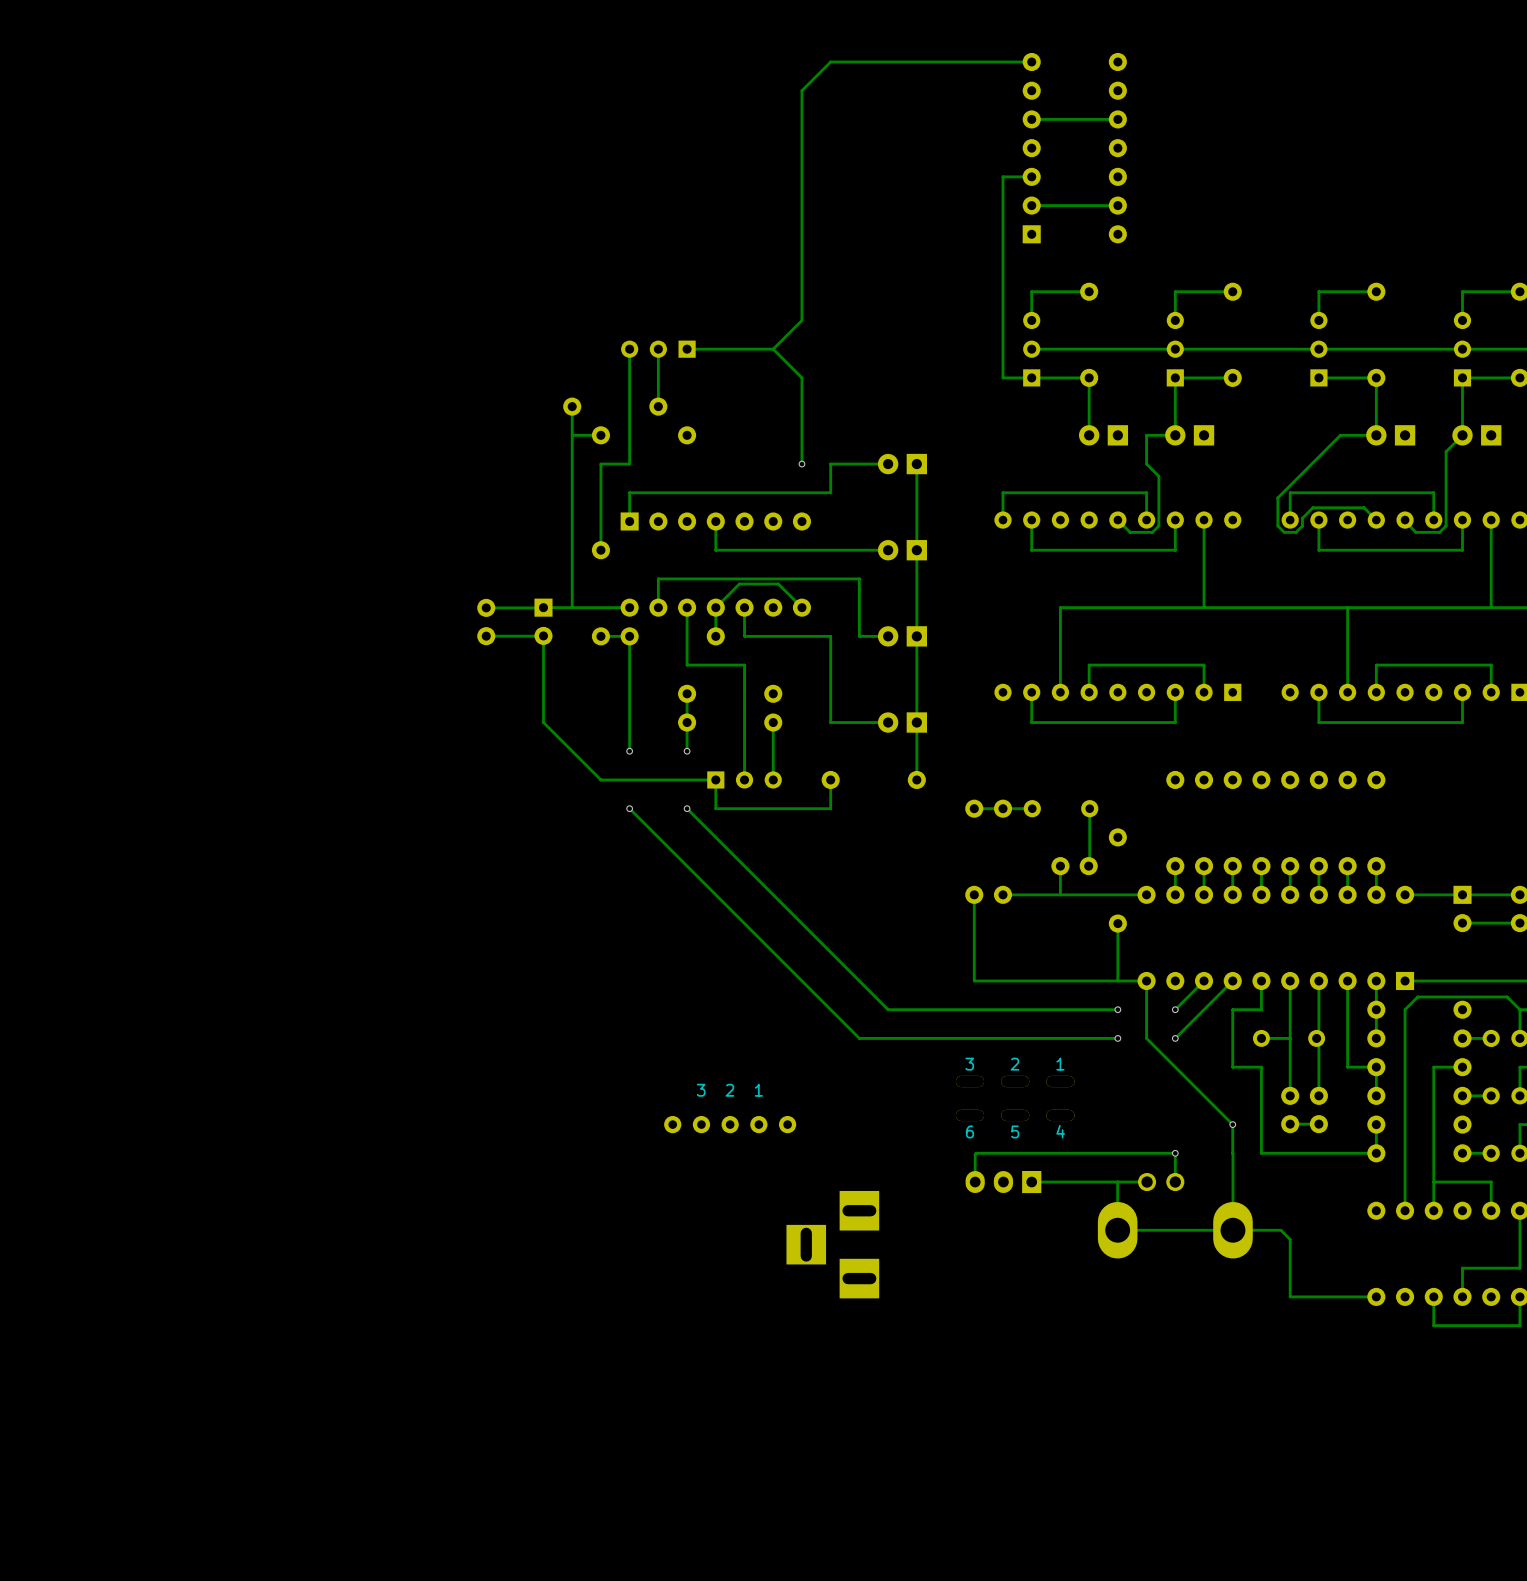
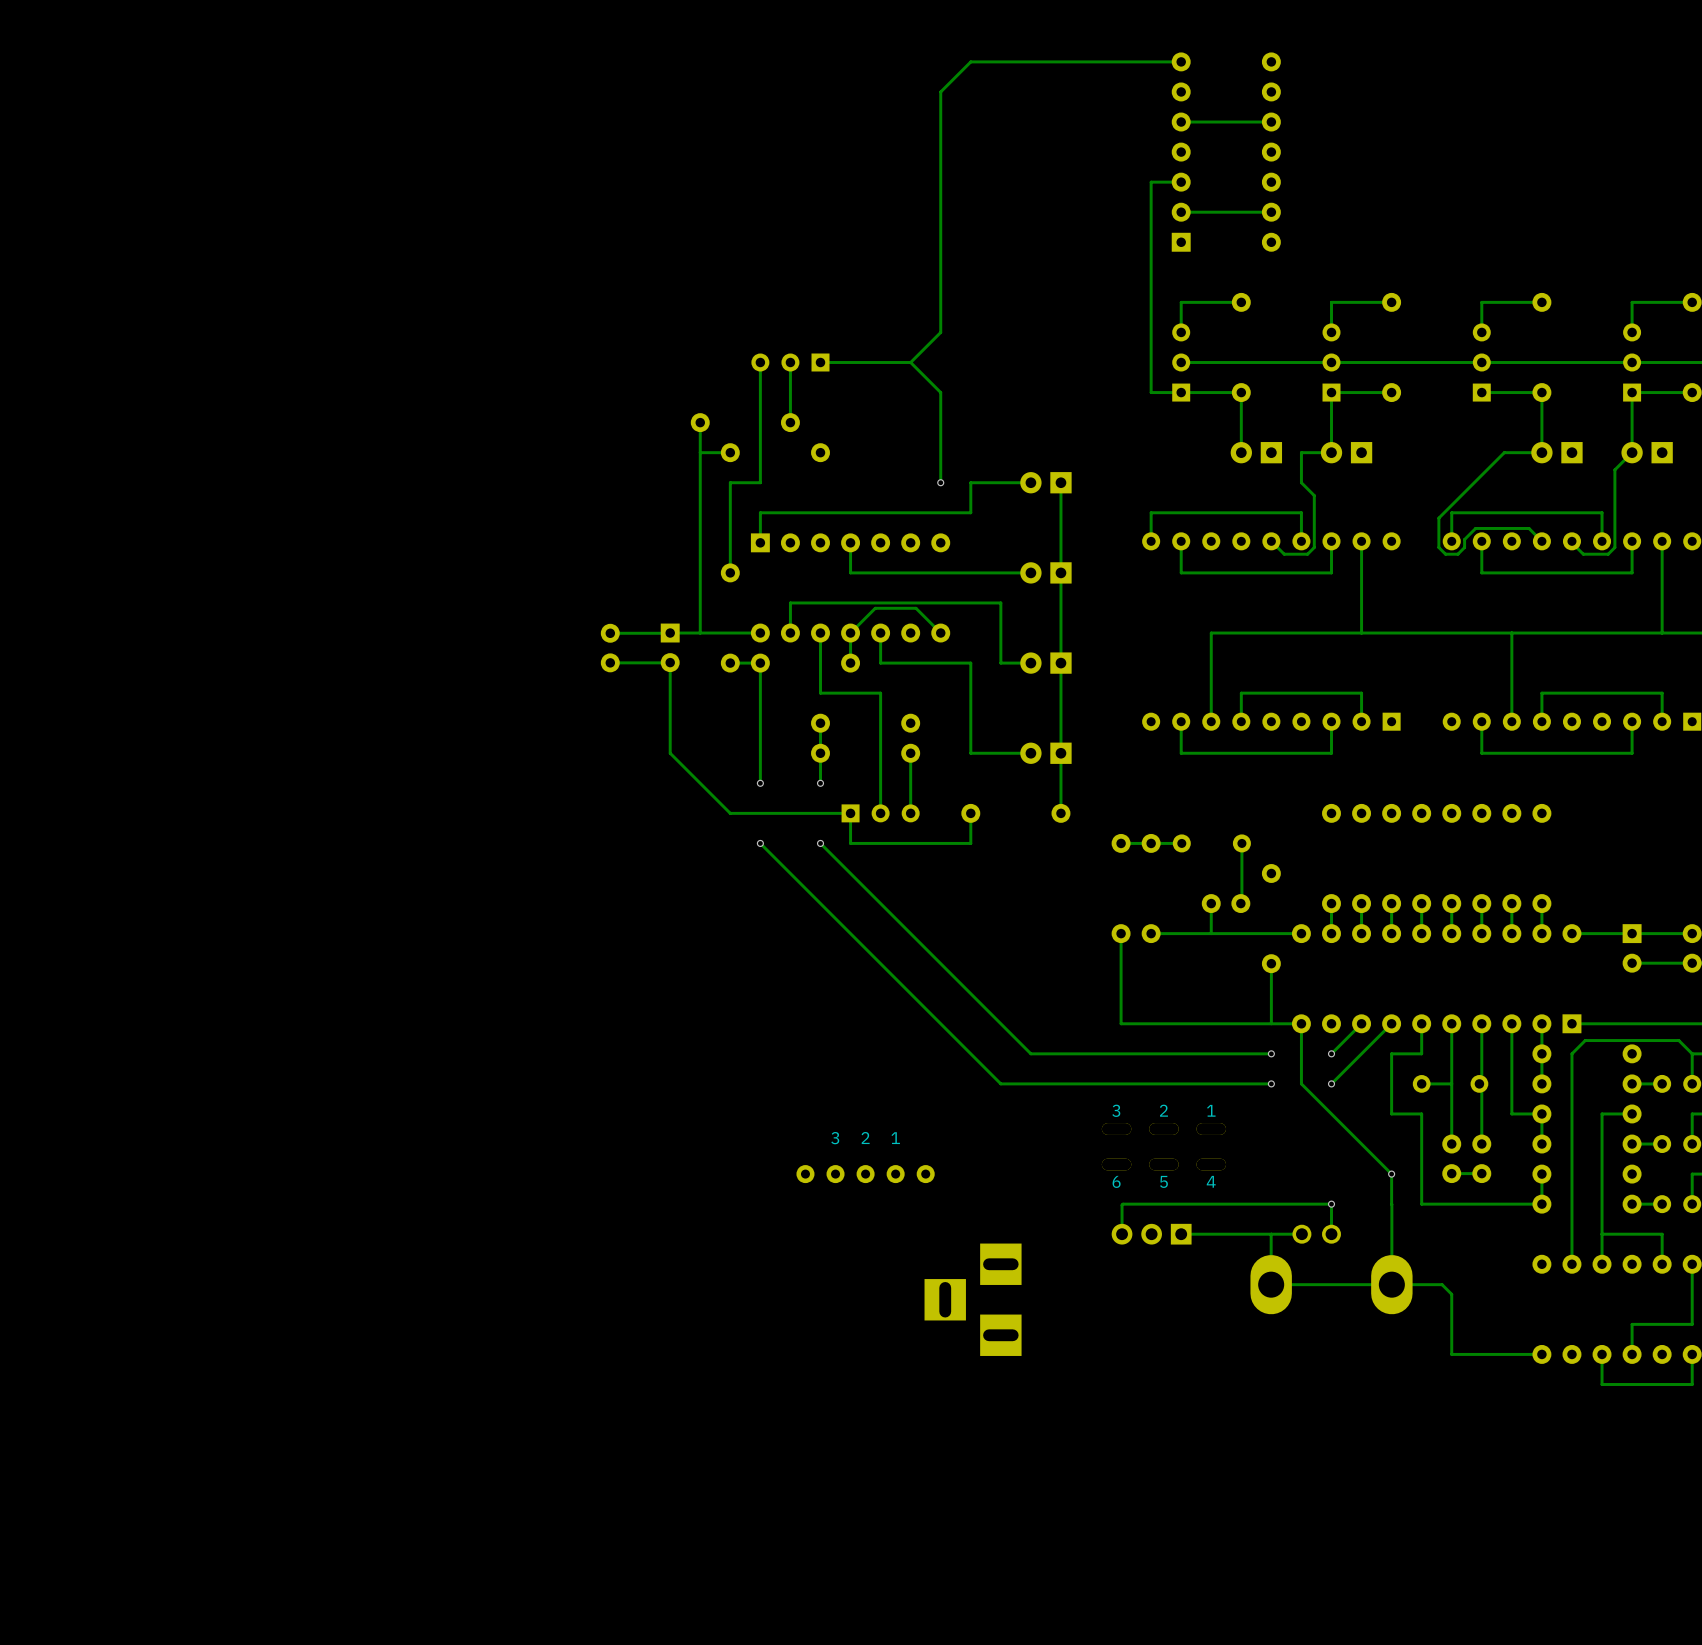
part footprint: [965, 1171, 1042, 1194] -> [1111, 1223, 1192, 1245]

